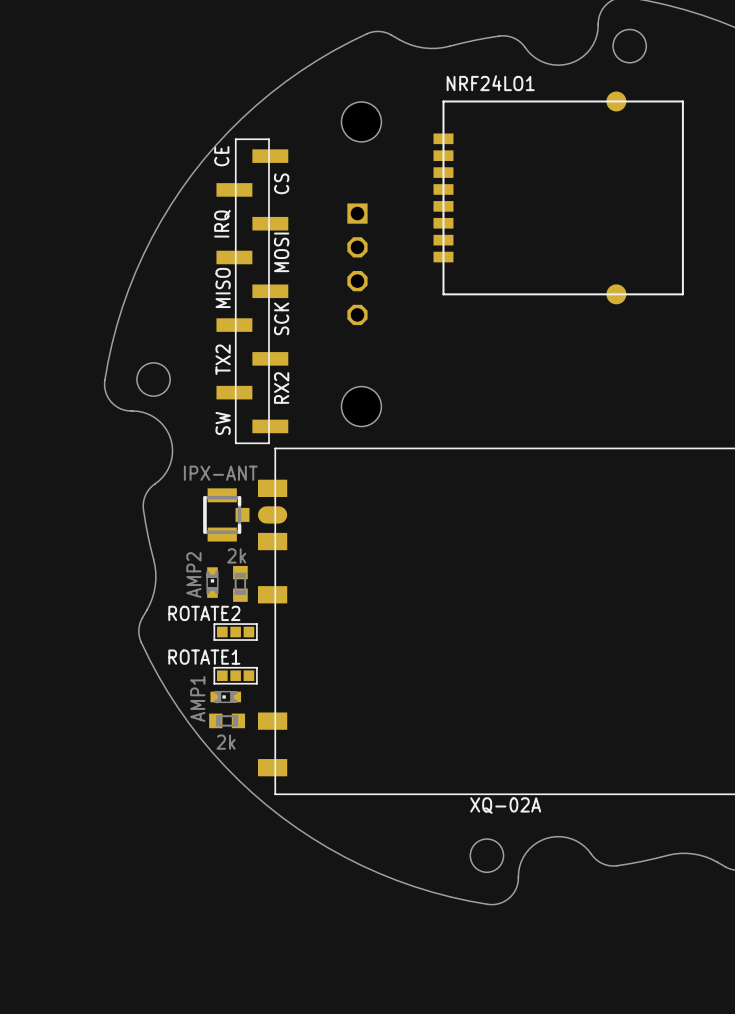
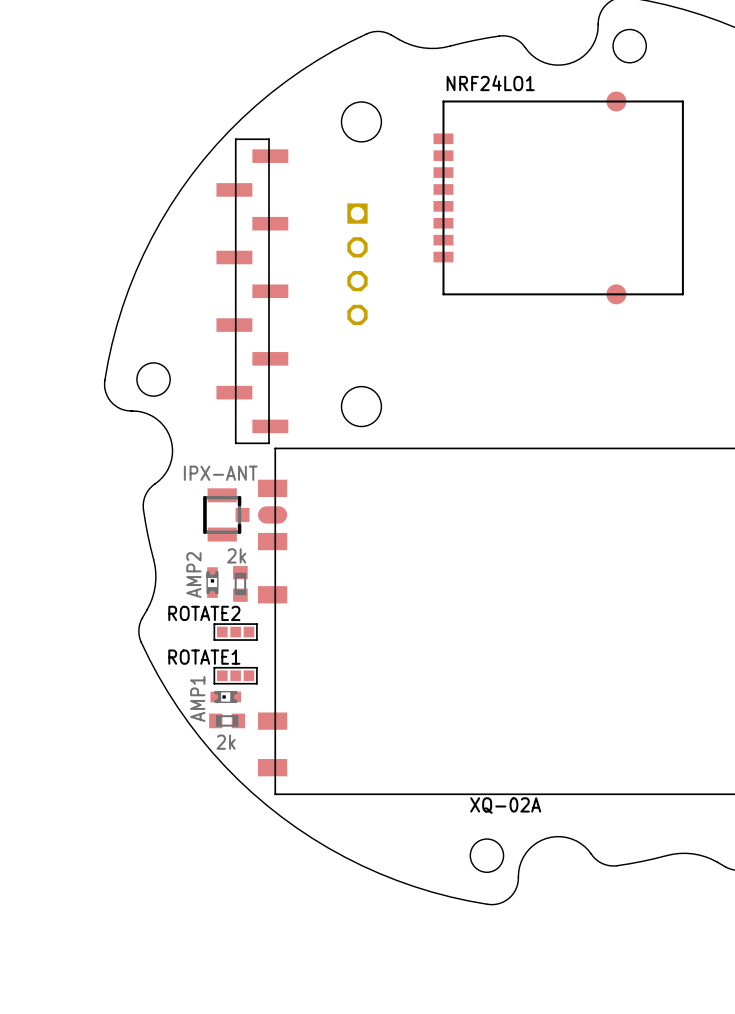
text: CE (221, 156) -> none
text: CS (281, 183) -> none
text: IRQ (222, 223) -> none
text: MOSI (281, 252) -> none
text: MISO (223, 287) -> none
text: SCK (281, 318) -> none
text: TX2 (223, 359) -> none
text: RX2 (281, 388) -> none
text: SW (223, 423) -> none

